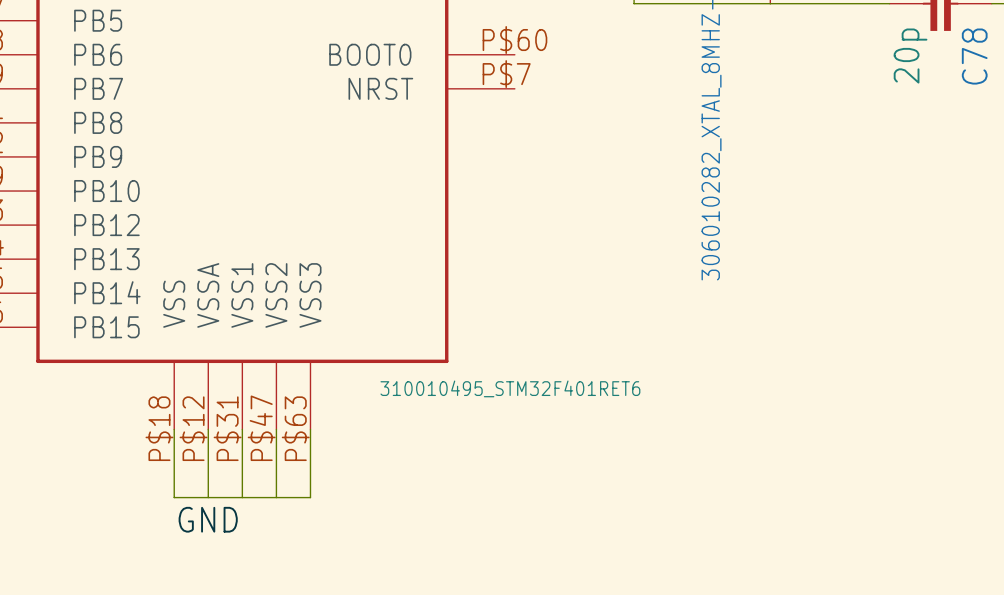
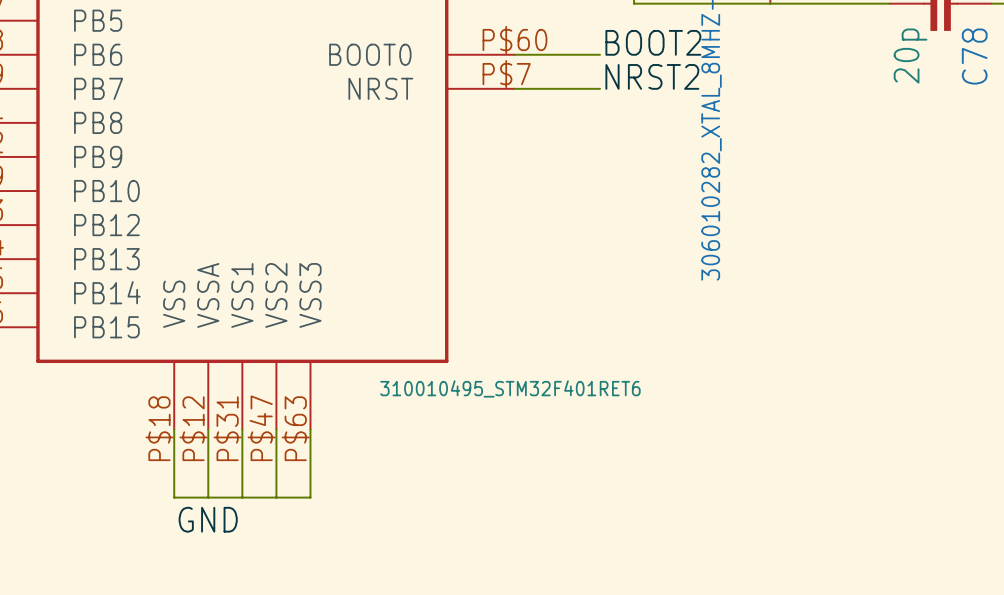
label: none -> BOOT2 (653, 42)
wire: none -> (514, 54) (600, 54)
label: none -> NRST2 (652, 76)
wire: none -> (514, 88) (600, 88)

